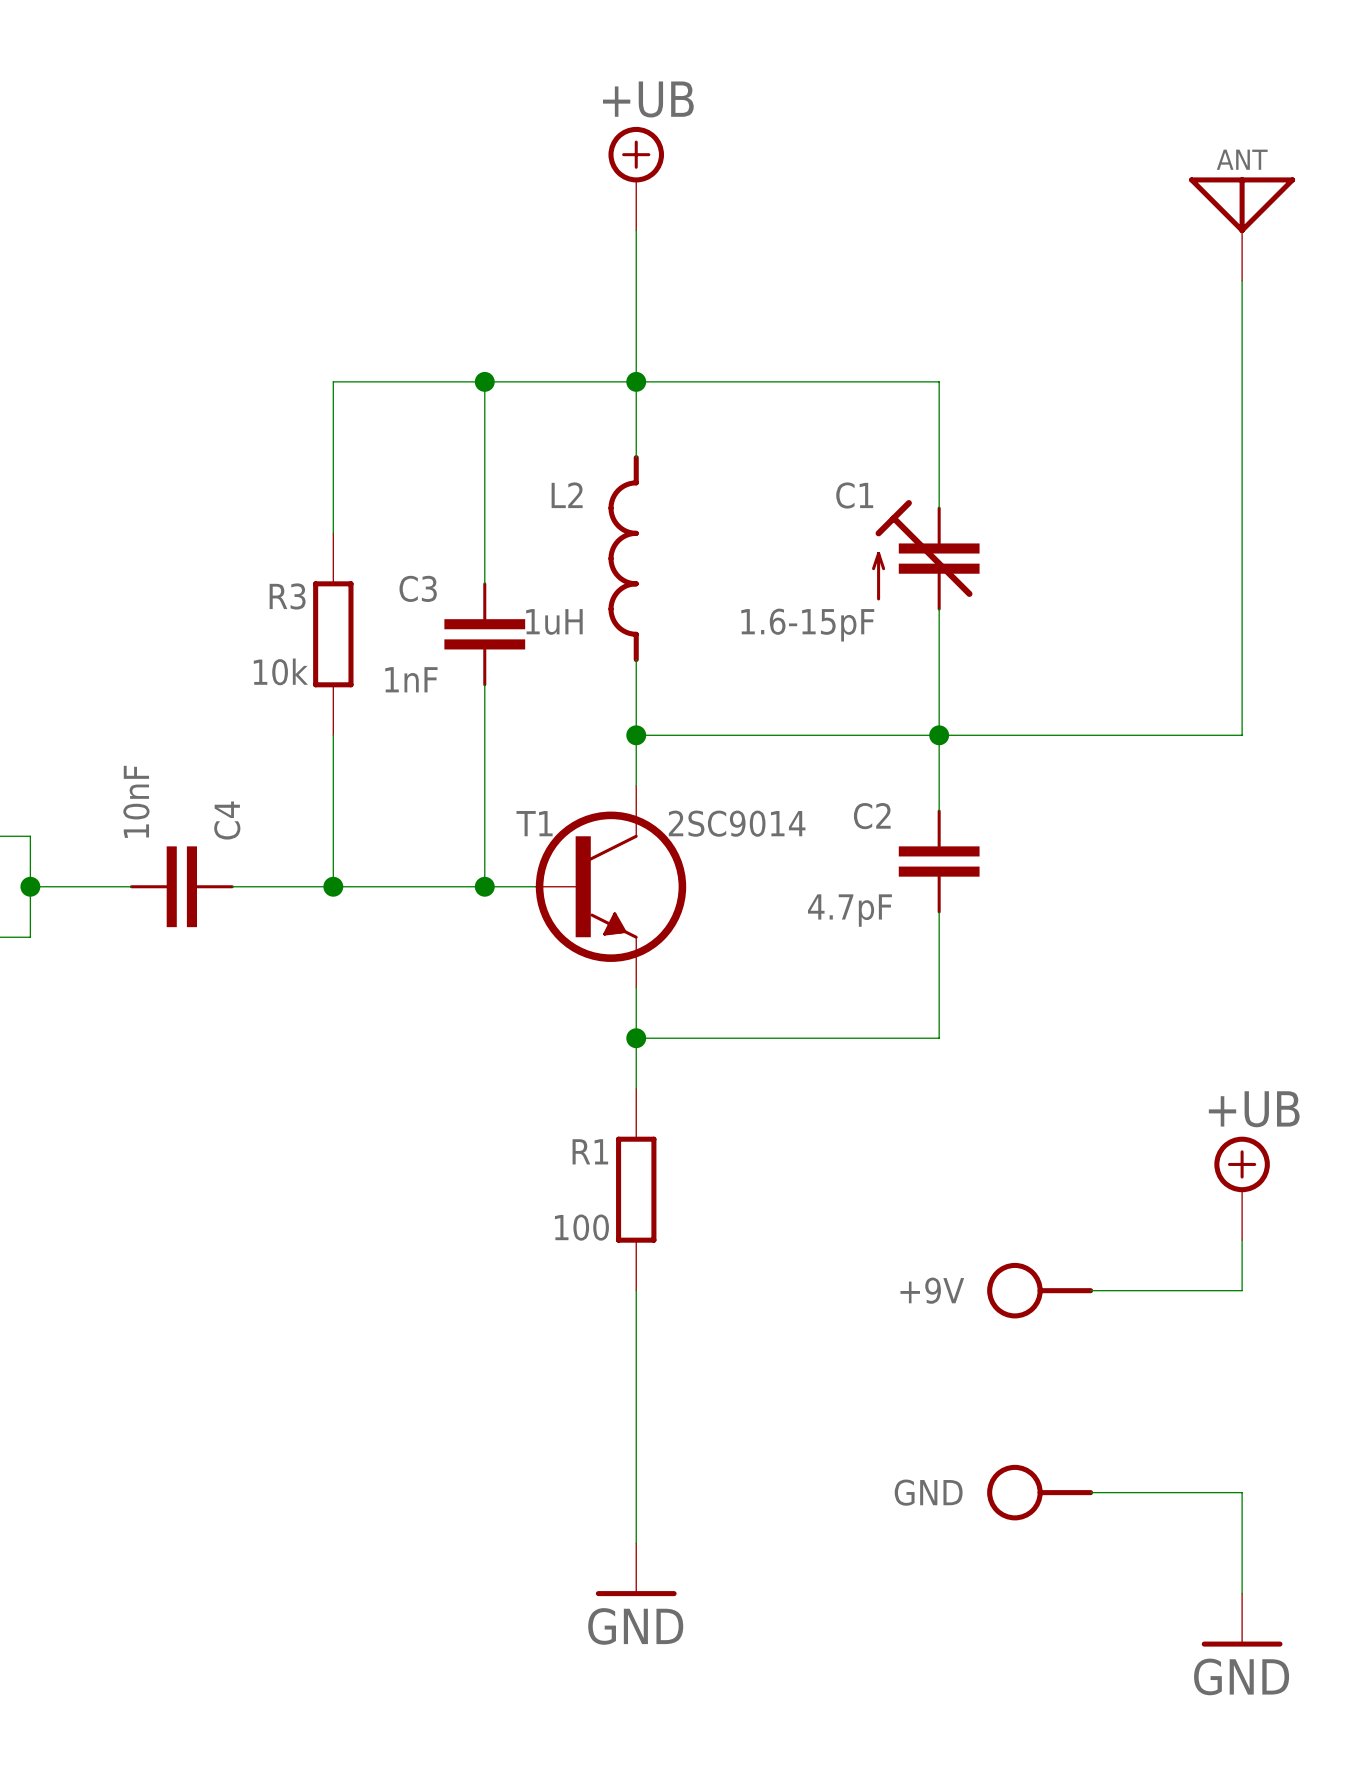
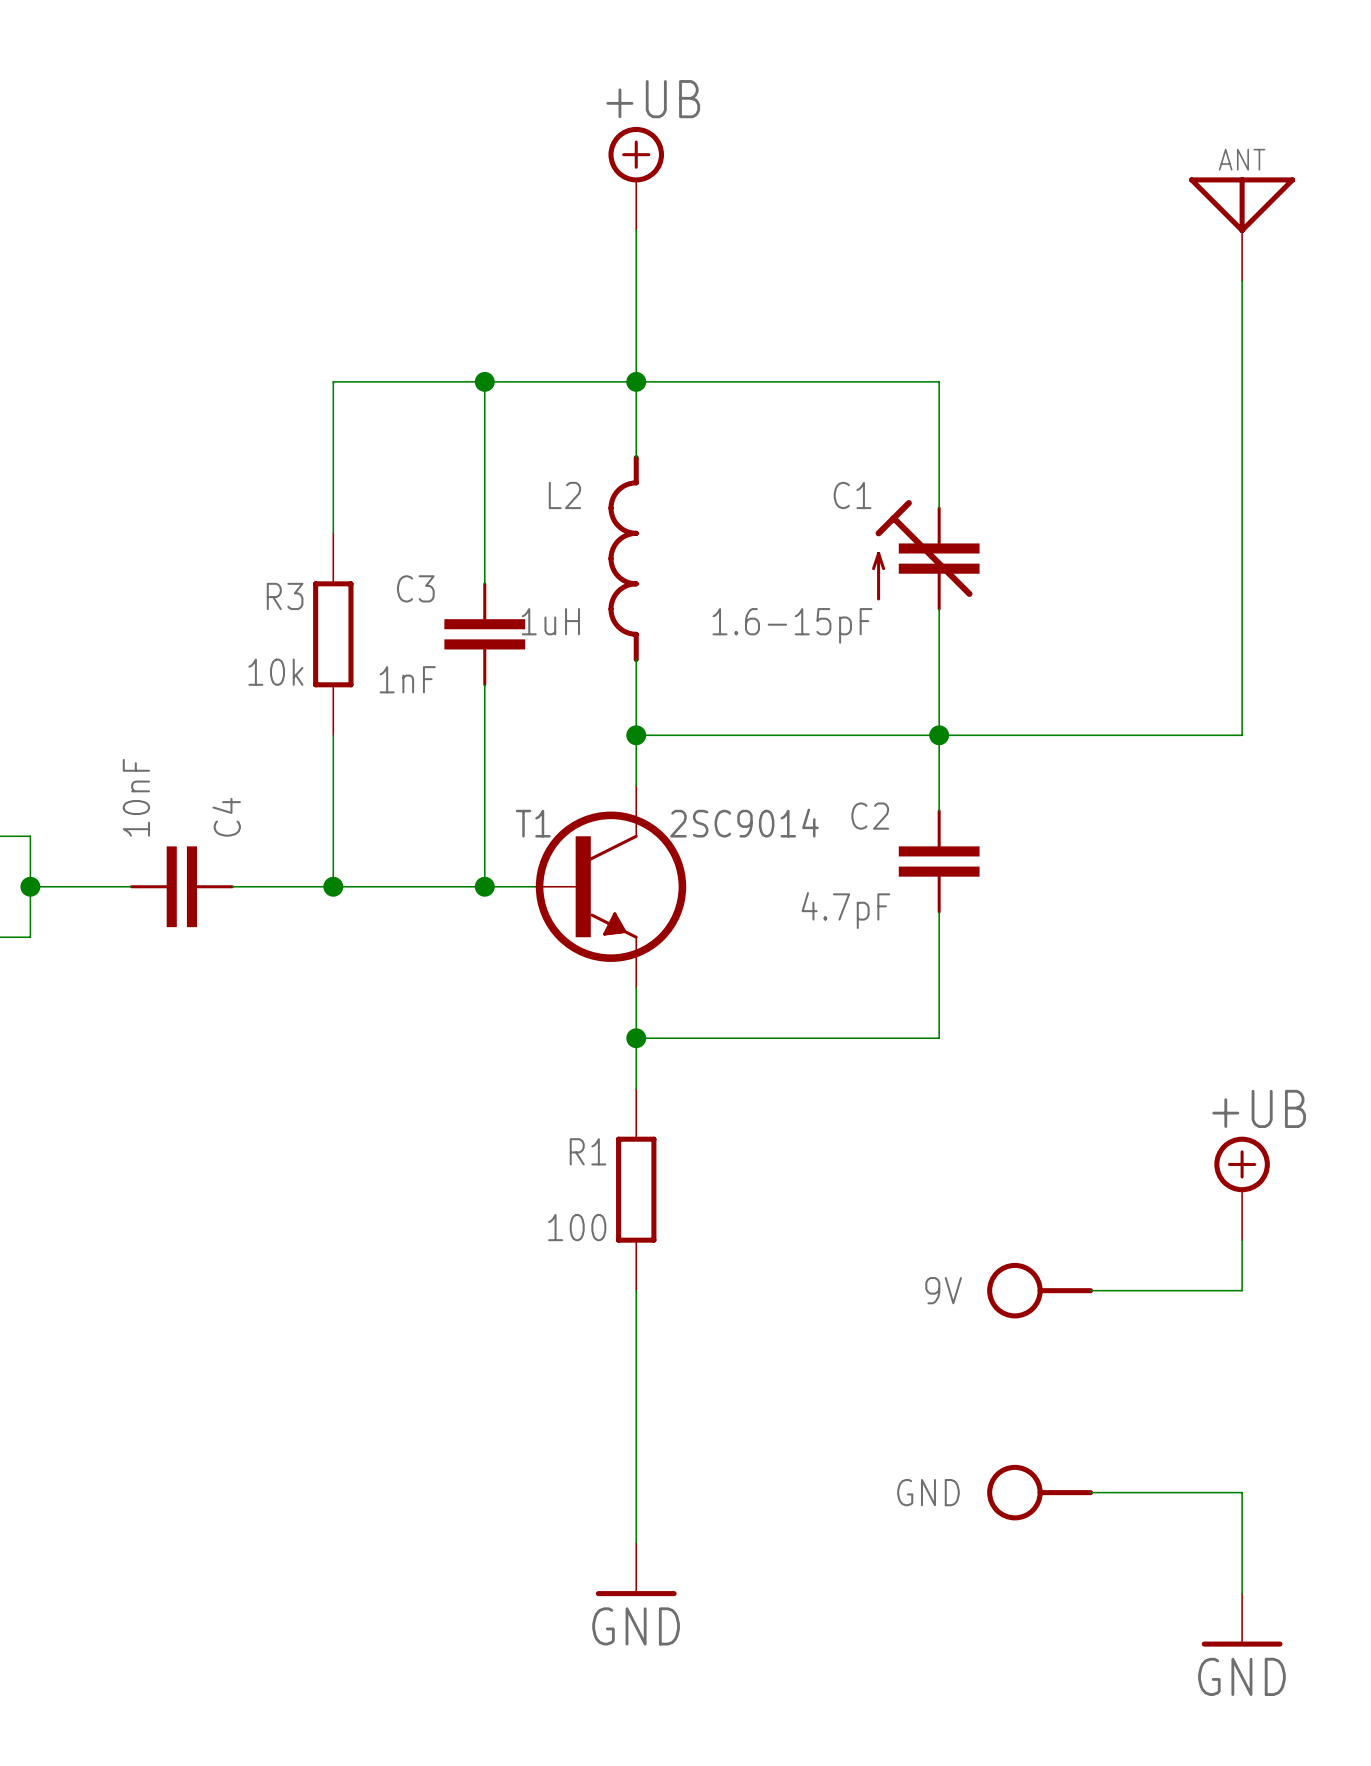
+9V name: +9V (932, 1290) -> 9V (943, 1290)

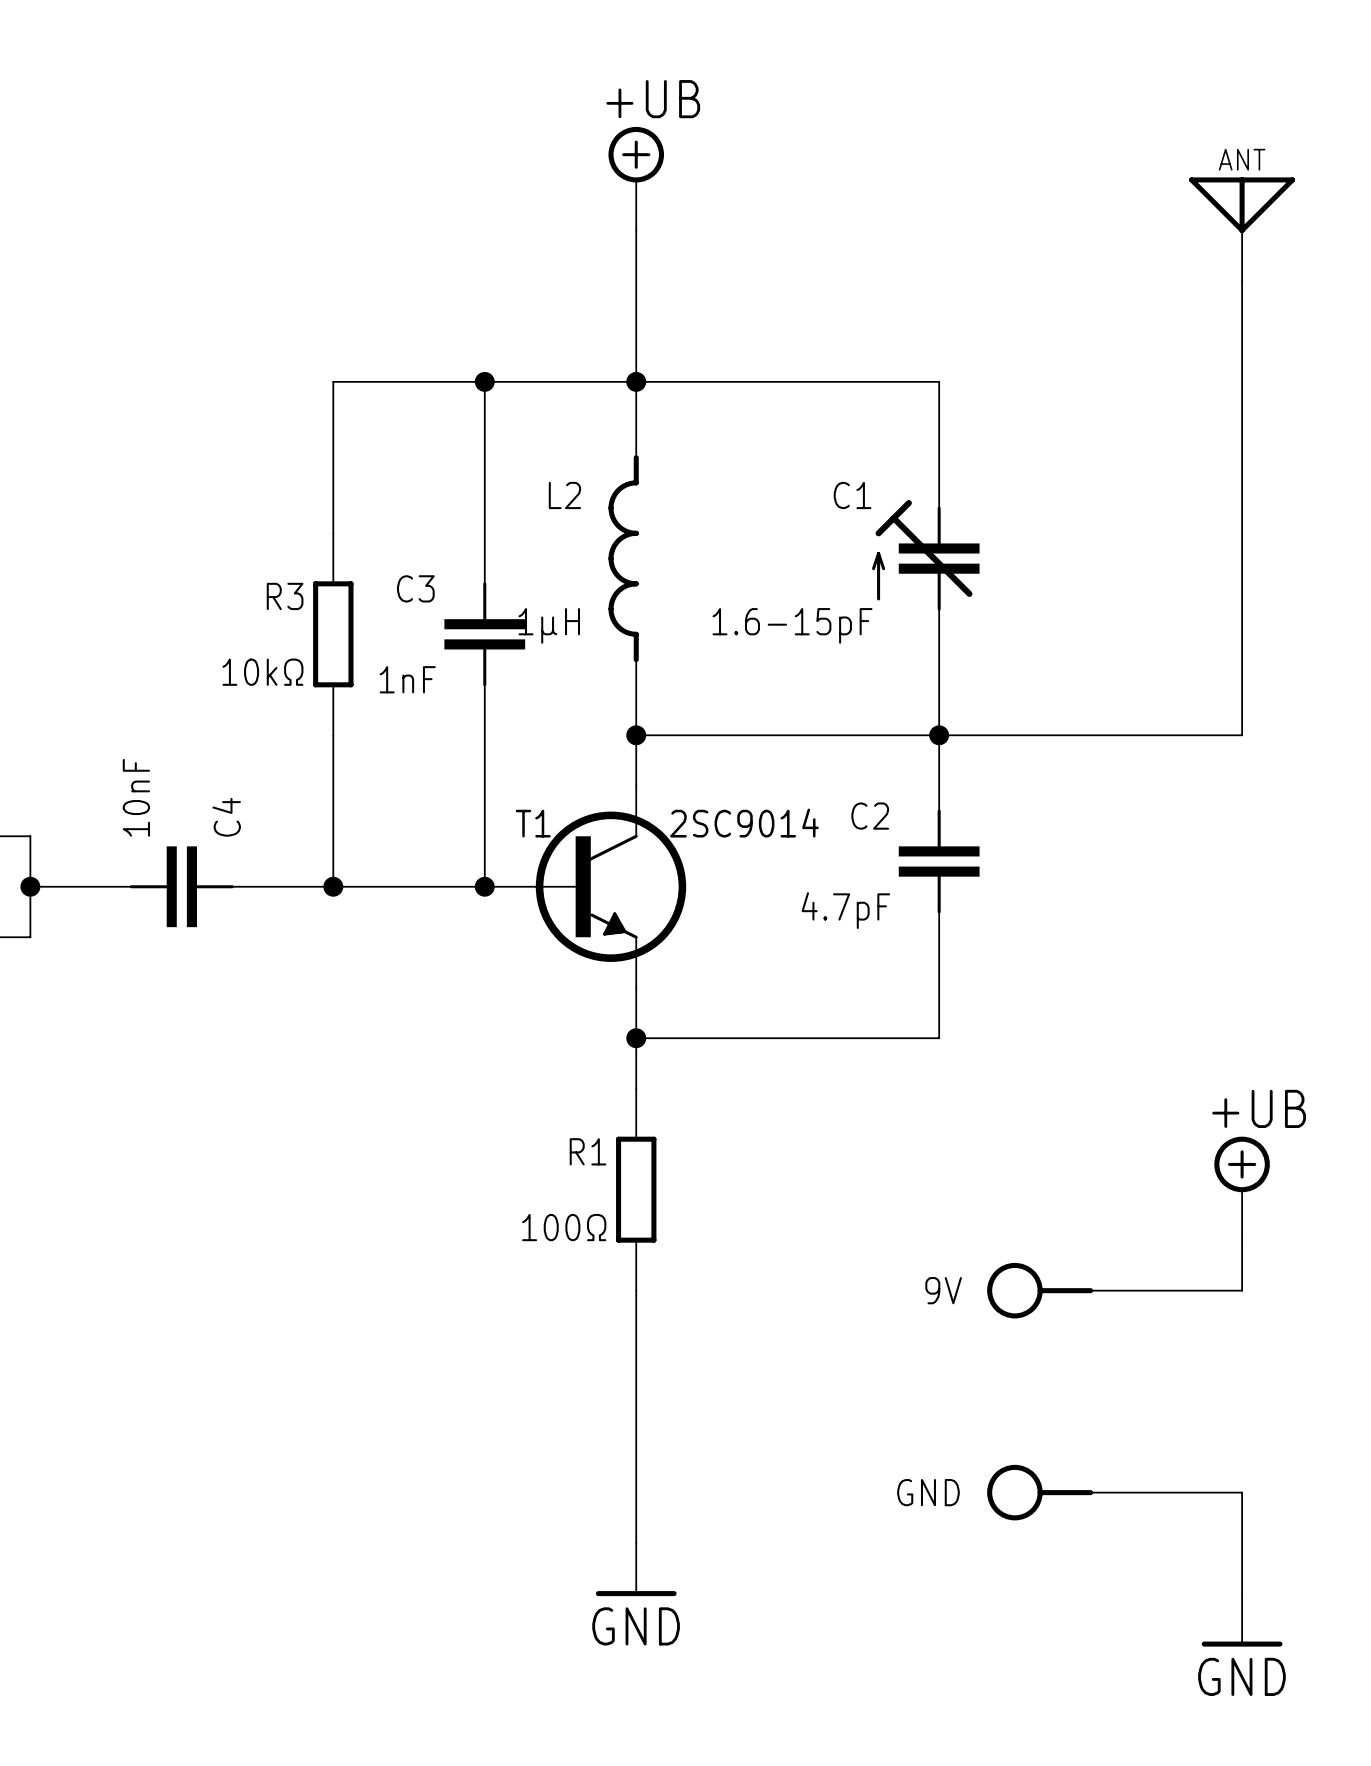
L2 value: 1uH (550, 621) -> 1μH (549, 625)
R3 value: 10k (275, 672) -> 10kΩ (262, 672)
R1 value: 100 (577, 1227) -> 100Ω (564, 1227)

